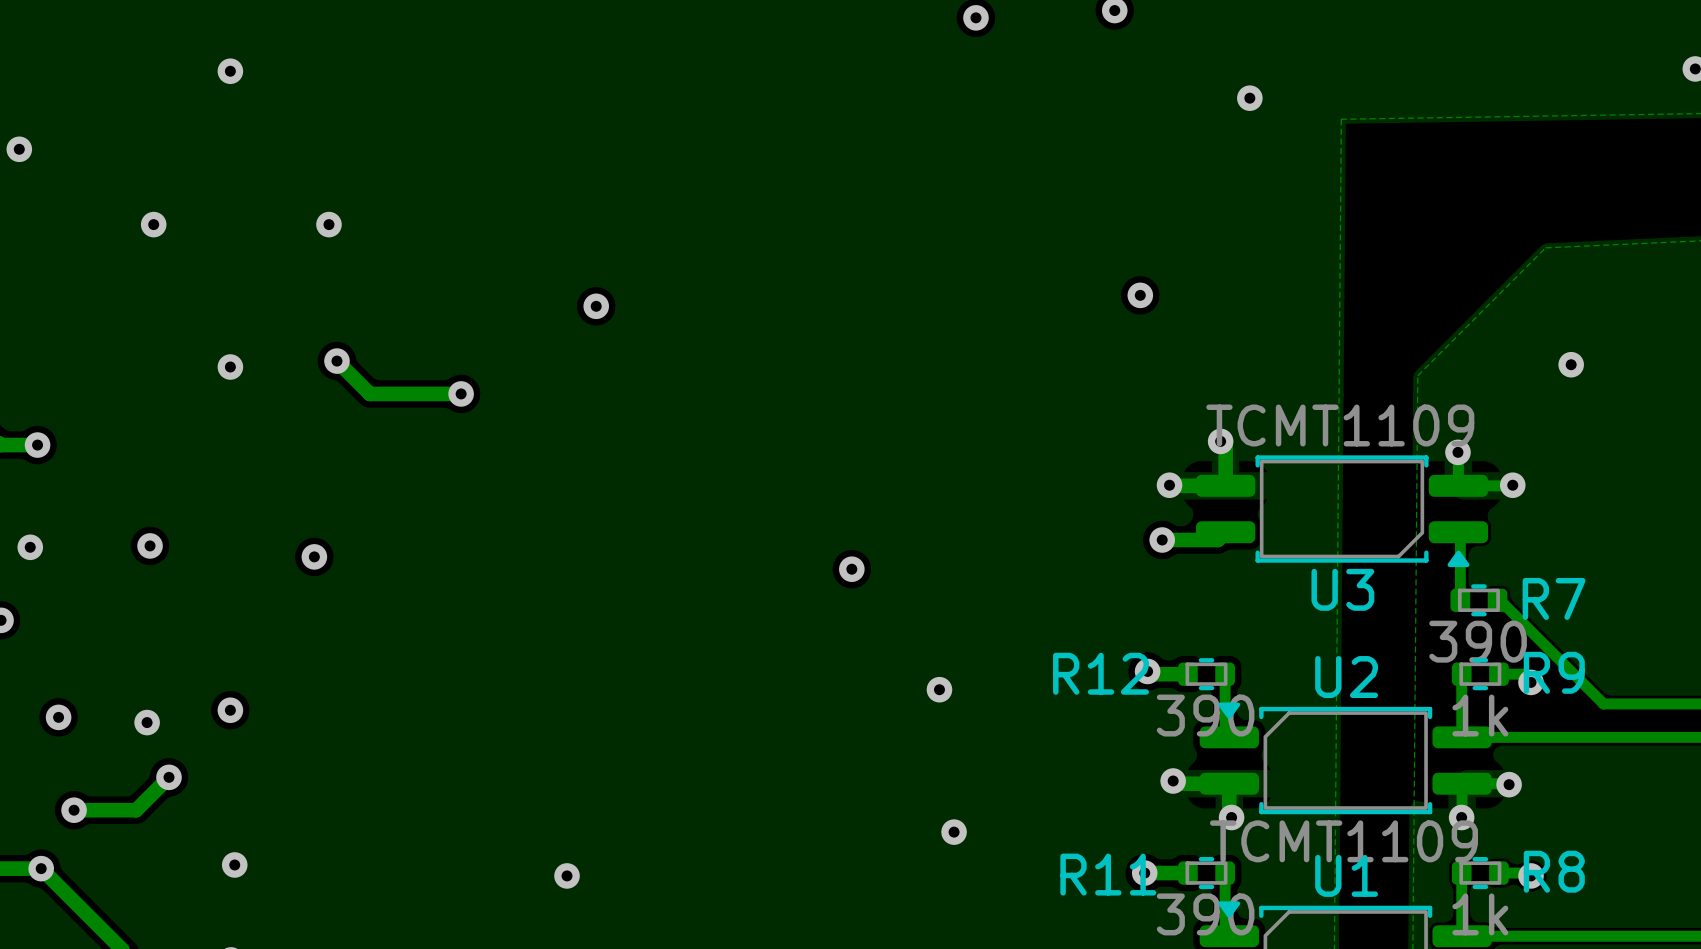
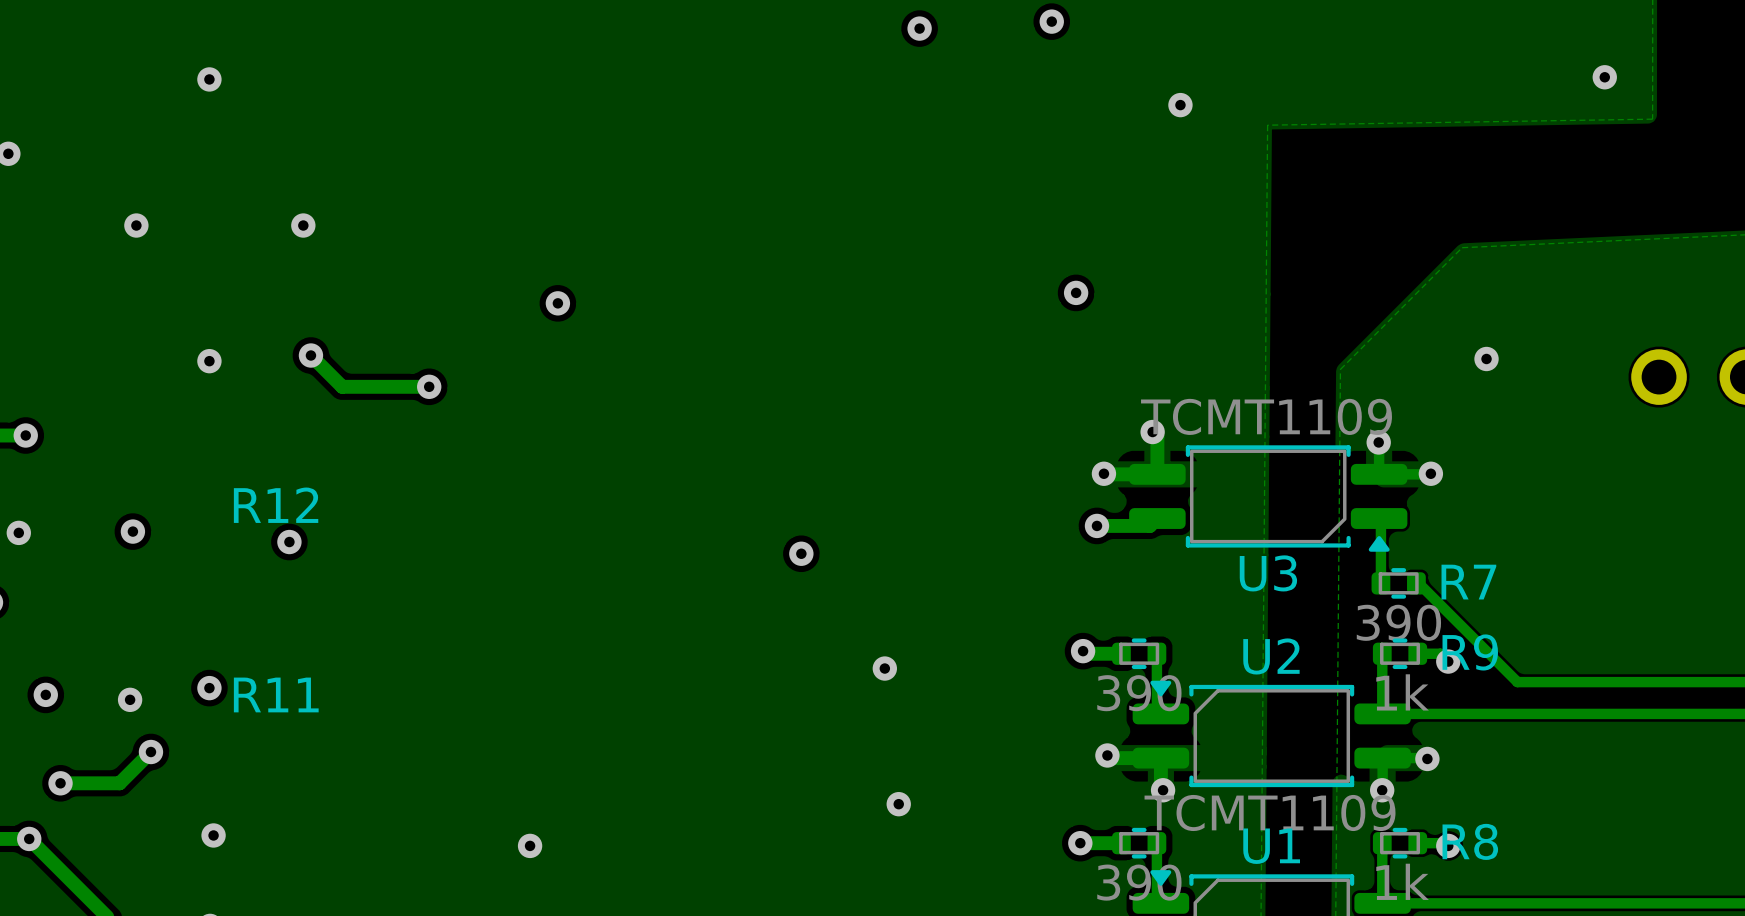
R12 name position: R12 (1101, 673) -> R12 (276, 505)
R11 name position: R11 (1108, 874) -> R11 (276, 694)

